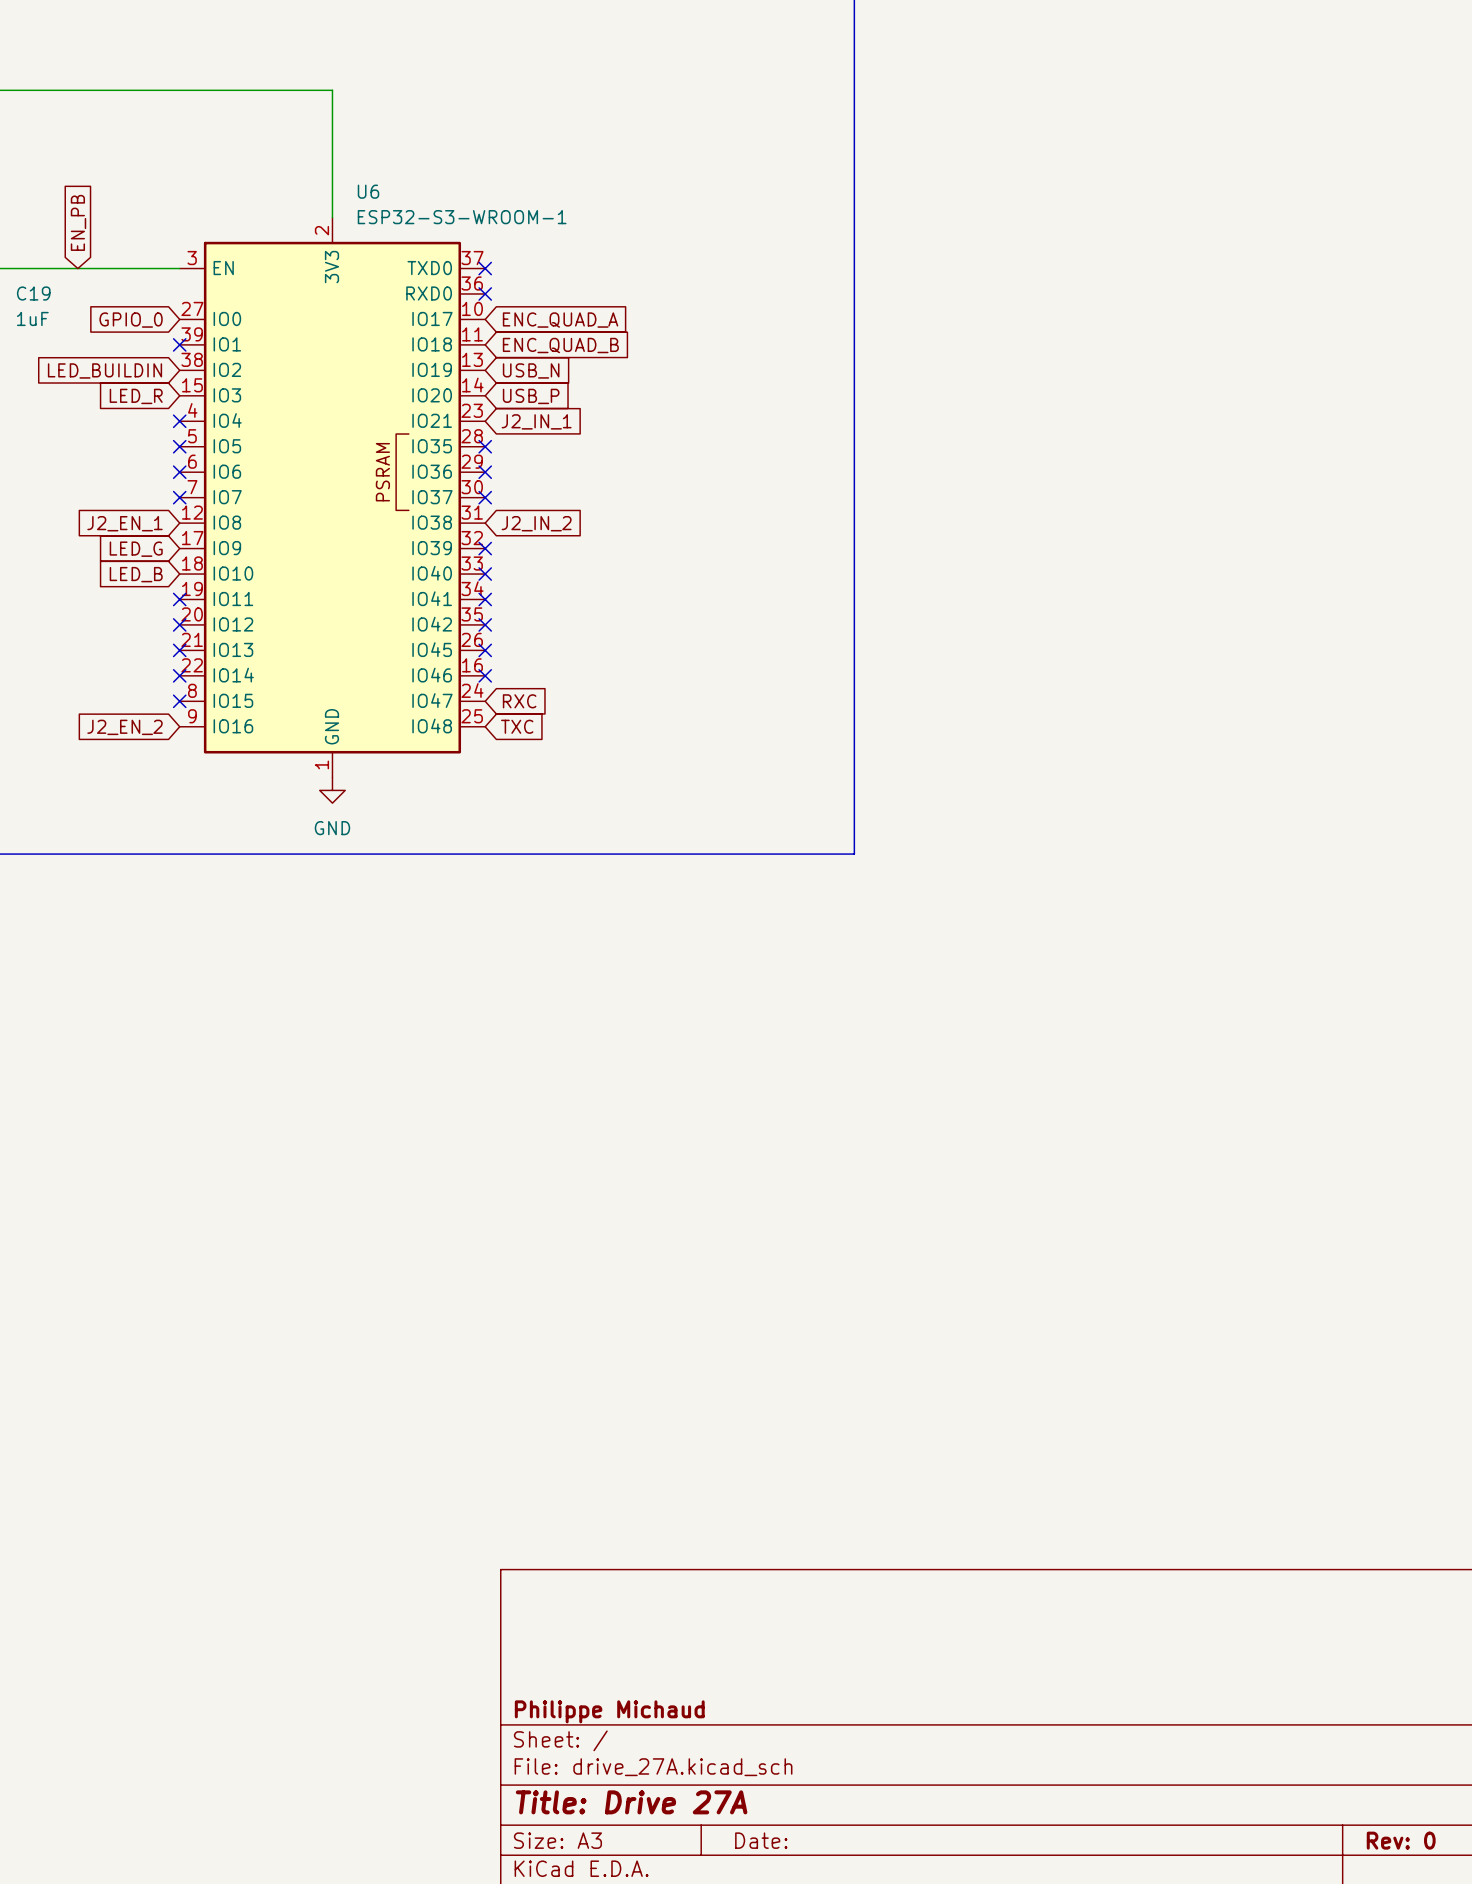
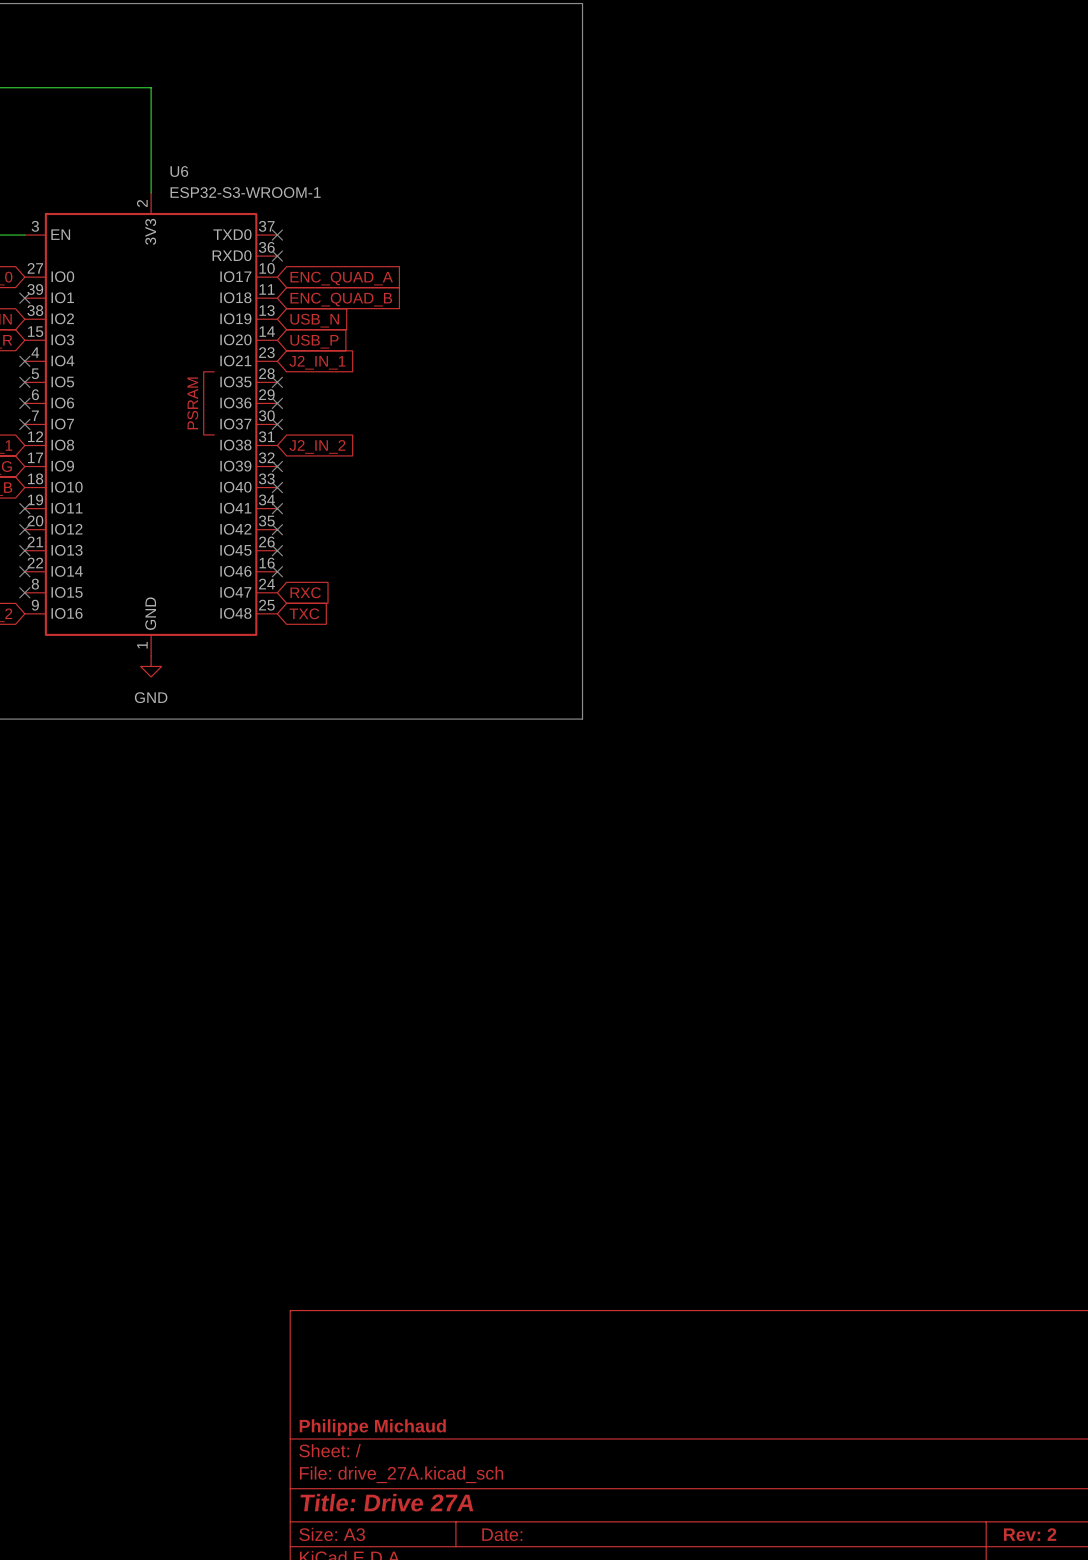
title block: Rev: 0 (1401, 1840) -> Rev: 2 (1030, 1534)

